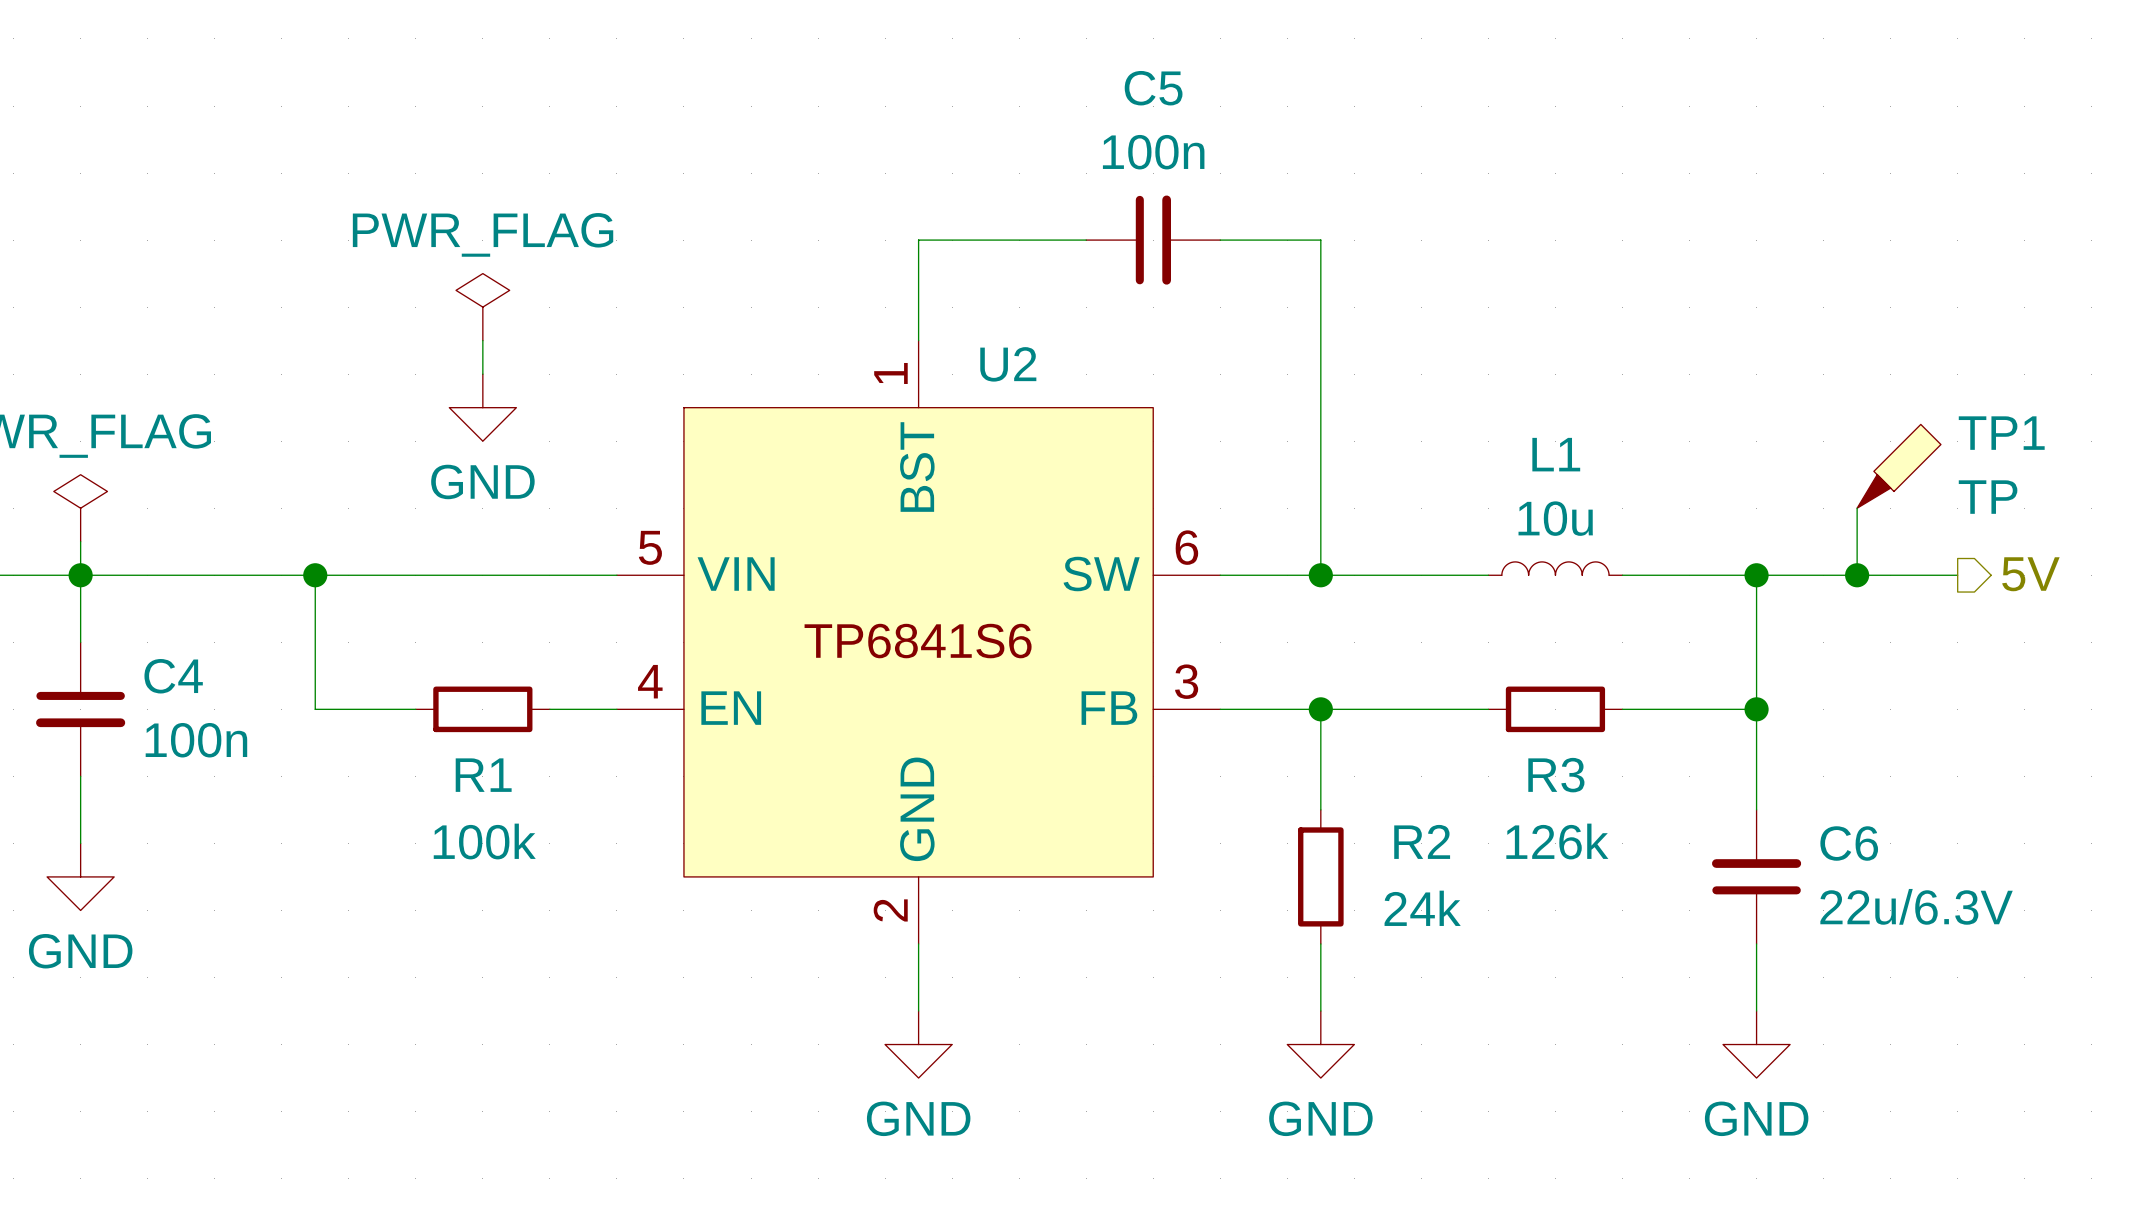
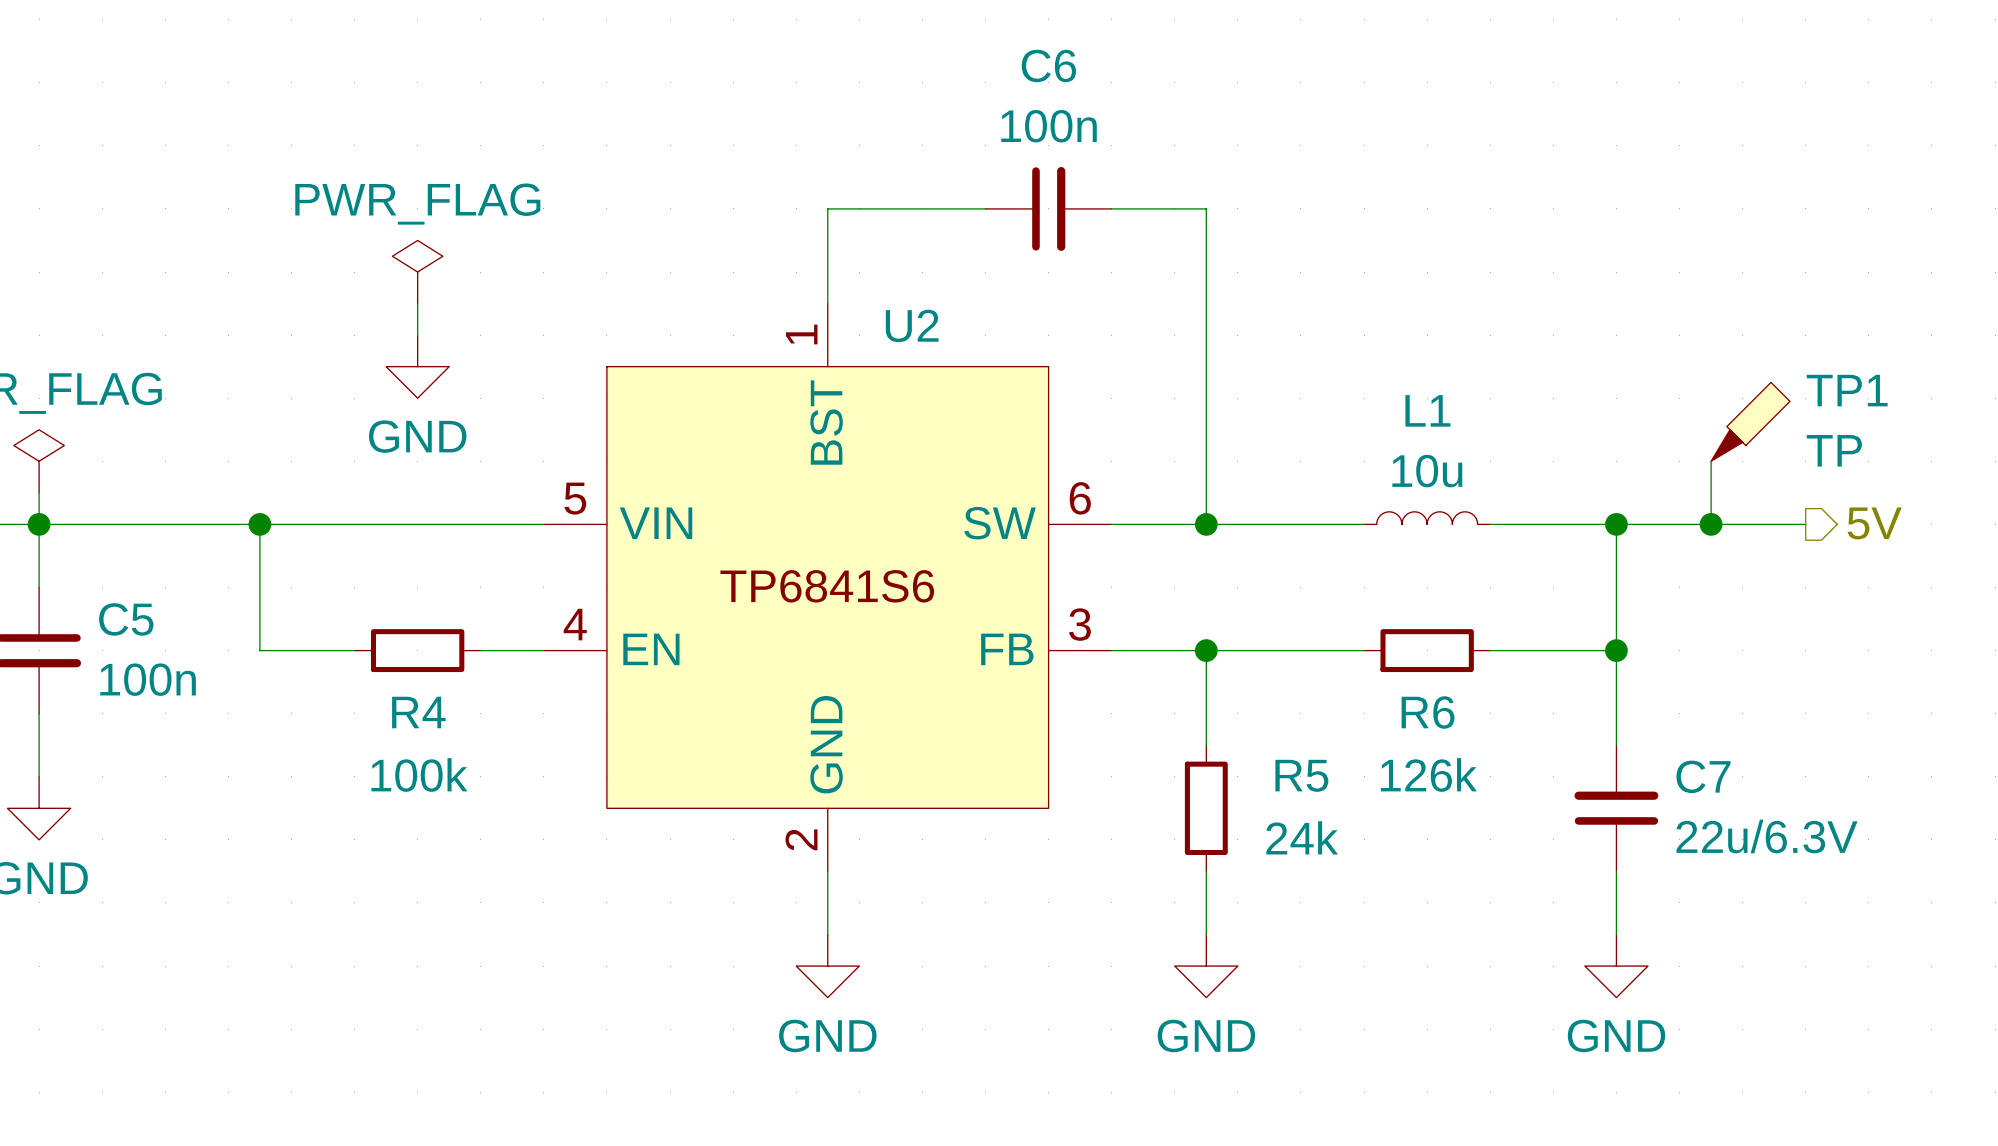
C5 name: C5 (1153, 88) -> C6 (1048, 65)
C4 name: C4 (173, 676) -> C5 (126, 619)
R1 name: R1 (483, 775) -> R4 (418, 712)
R3 name: R3 (1556, 775) -> R6 (1428, 712)
R2 name: R2 (1422, 841) -> R5 (1301, 775)
C6 name: C6 (1849, 843) -> C7 (1703, 776)

